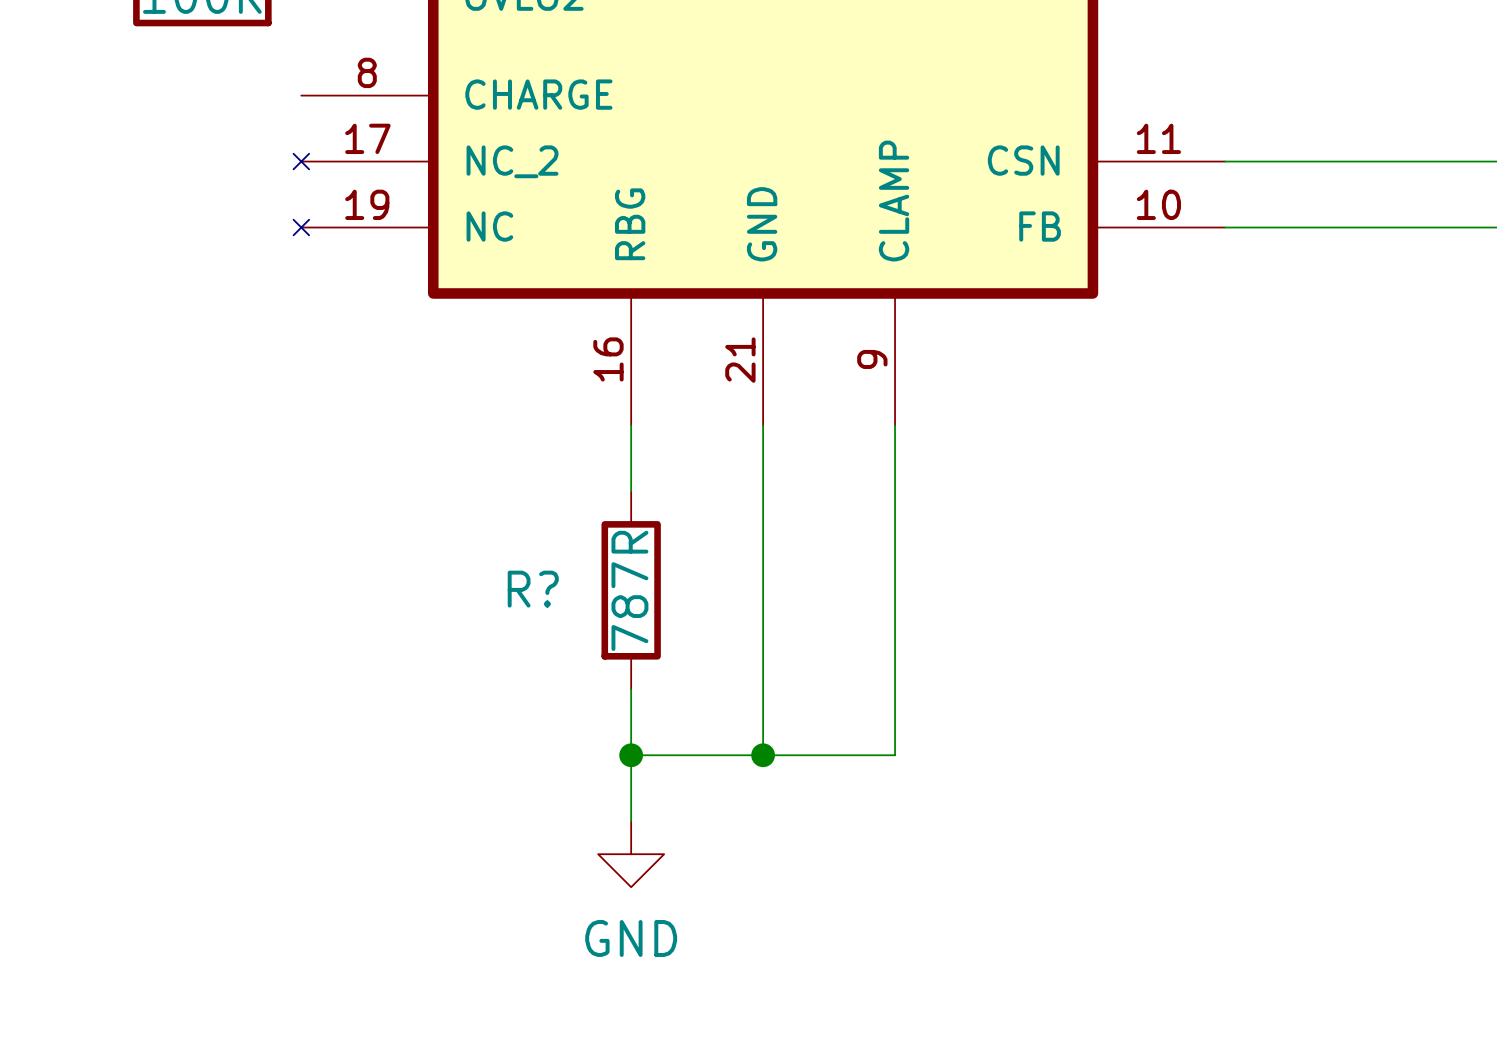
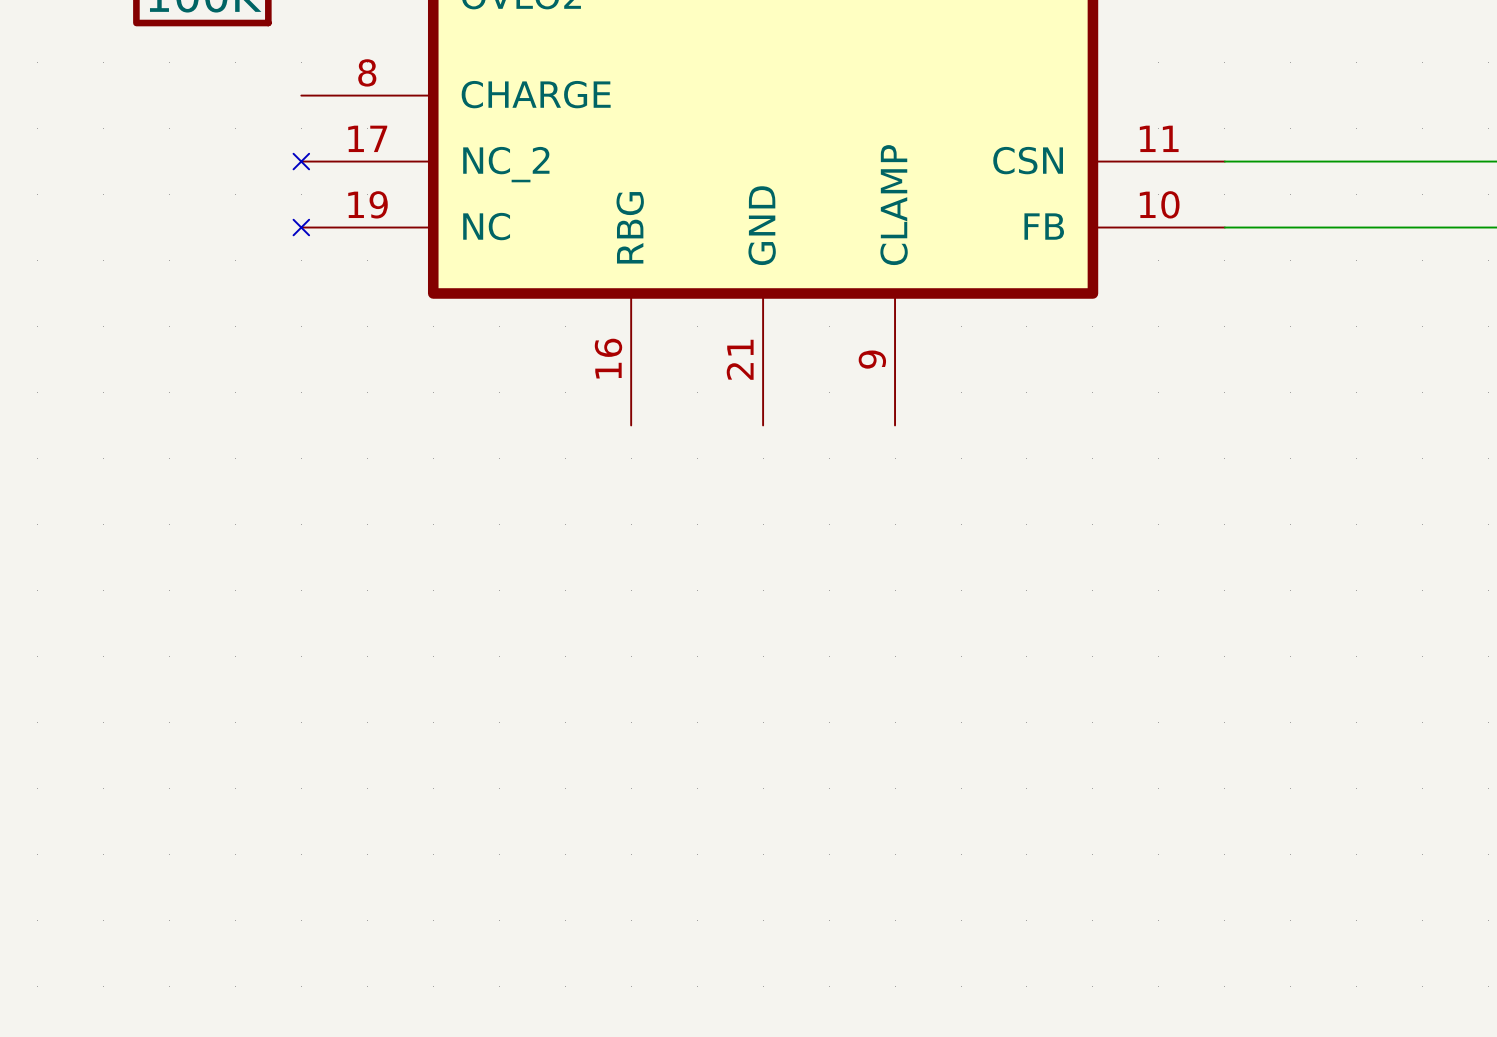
wire: (631, 425) (631, 491) -> none
wire: (763, 425) (763, 755) -> none
wire: (895, 425) (895, 755) (631, 755) -> none
R?: 787R (631, 590) -> none
wire: (631, 689) (631, 821) -> none
junction: (631, 755) -> none
junction: (763, 755) -> none
power symbol: GND (631, 854) -> none

